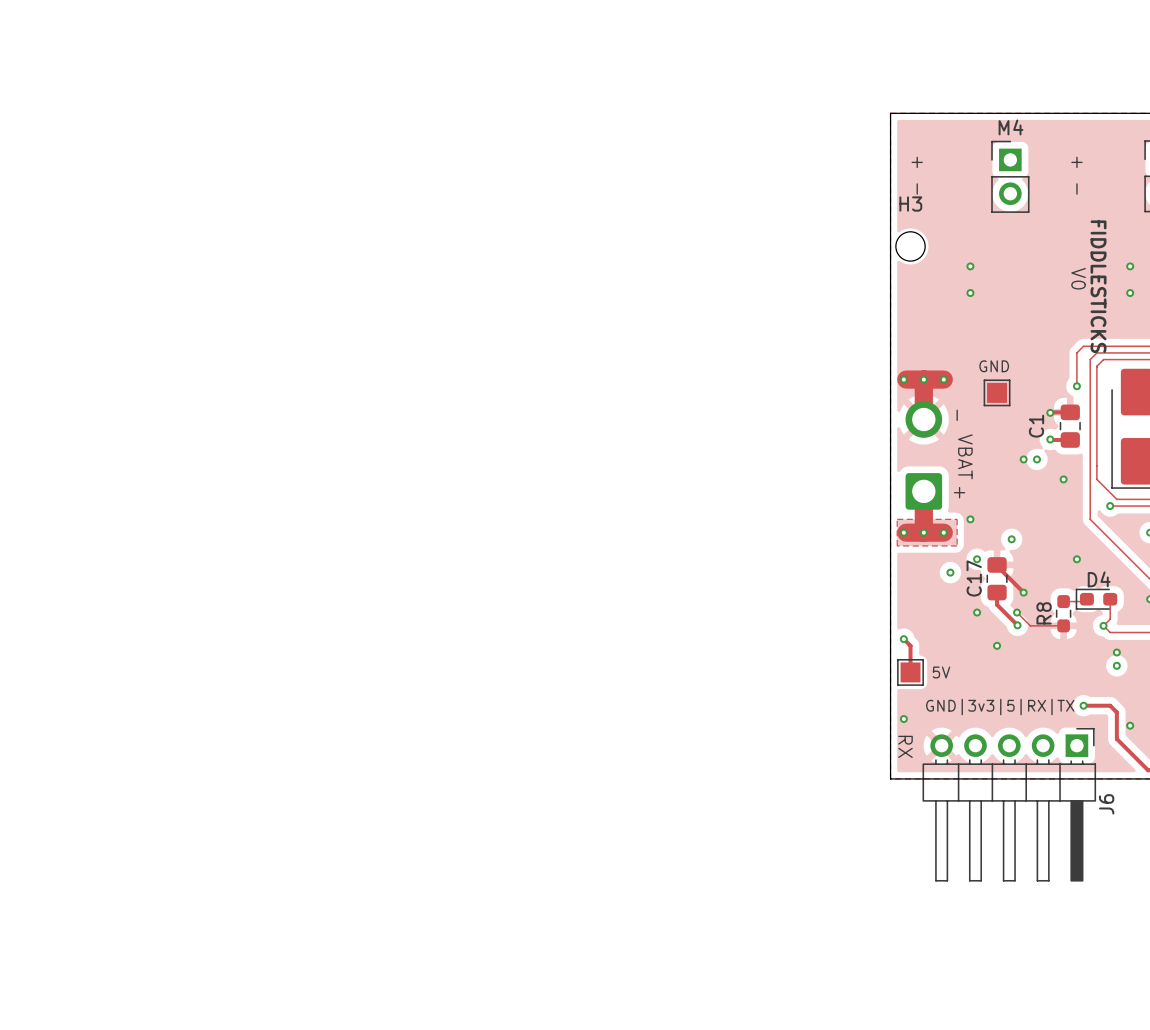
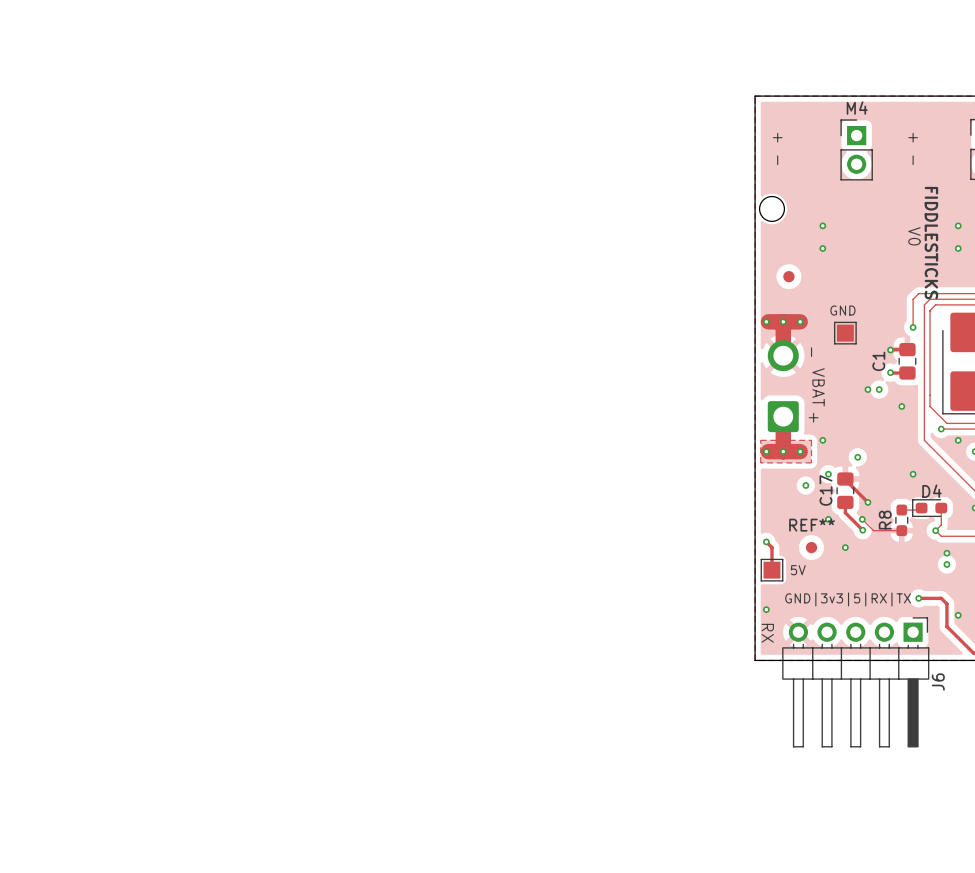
H3 name: H3 (910, 204) -> none
part: none -> (788, 276)
via: none -> (958, 440)
REF**: none -> (811, 547)

